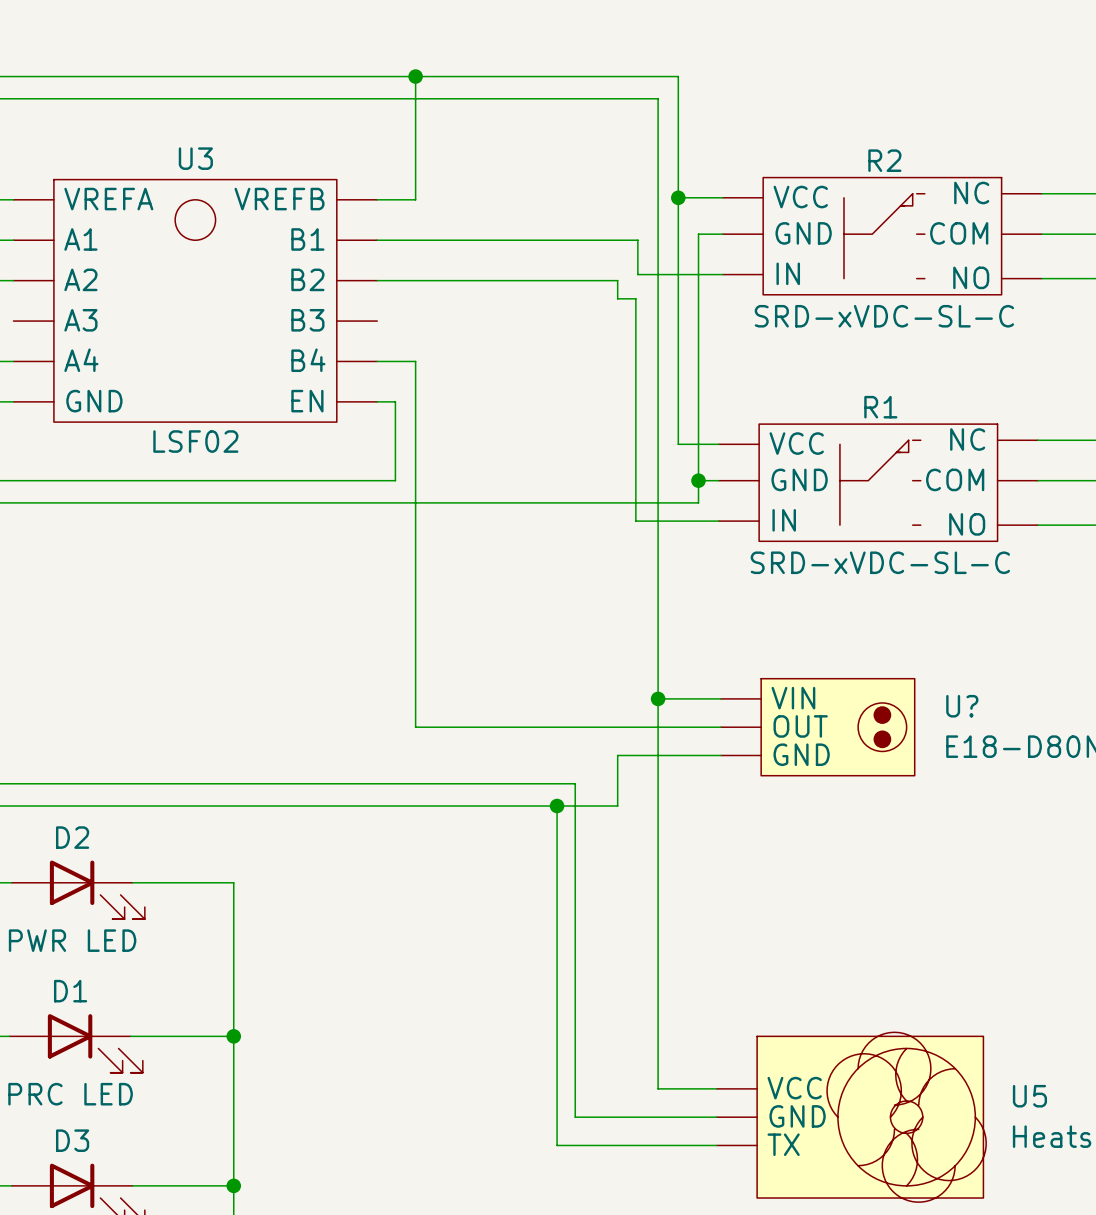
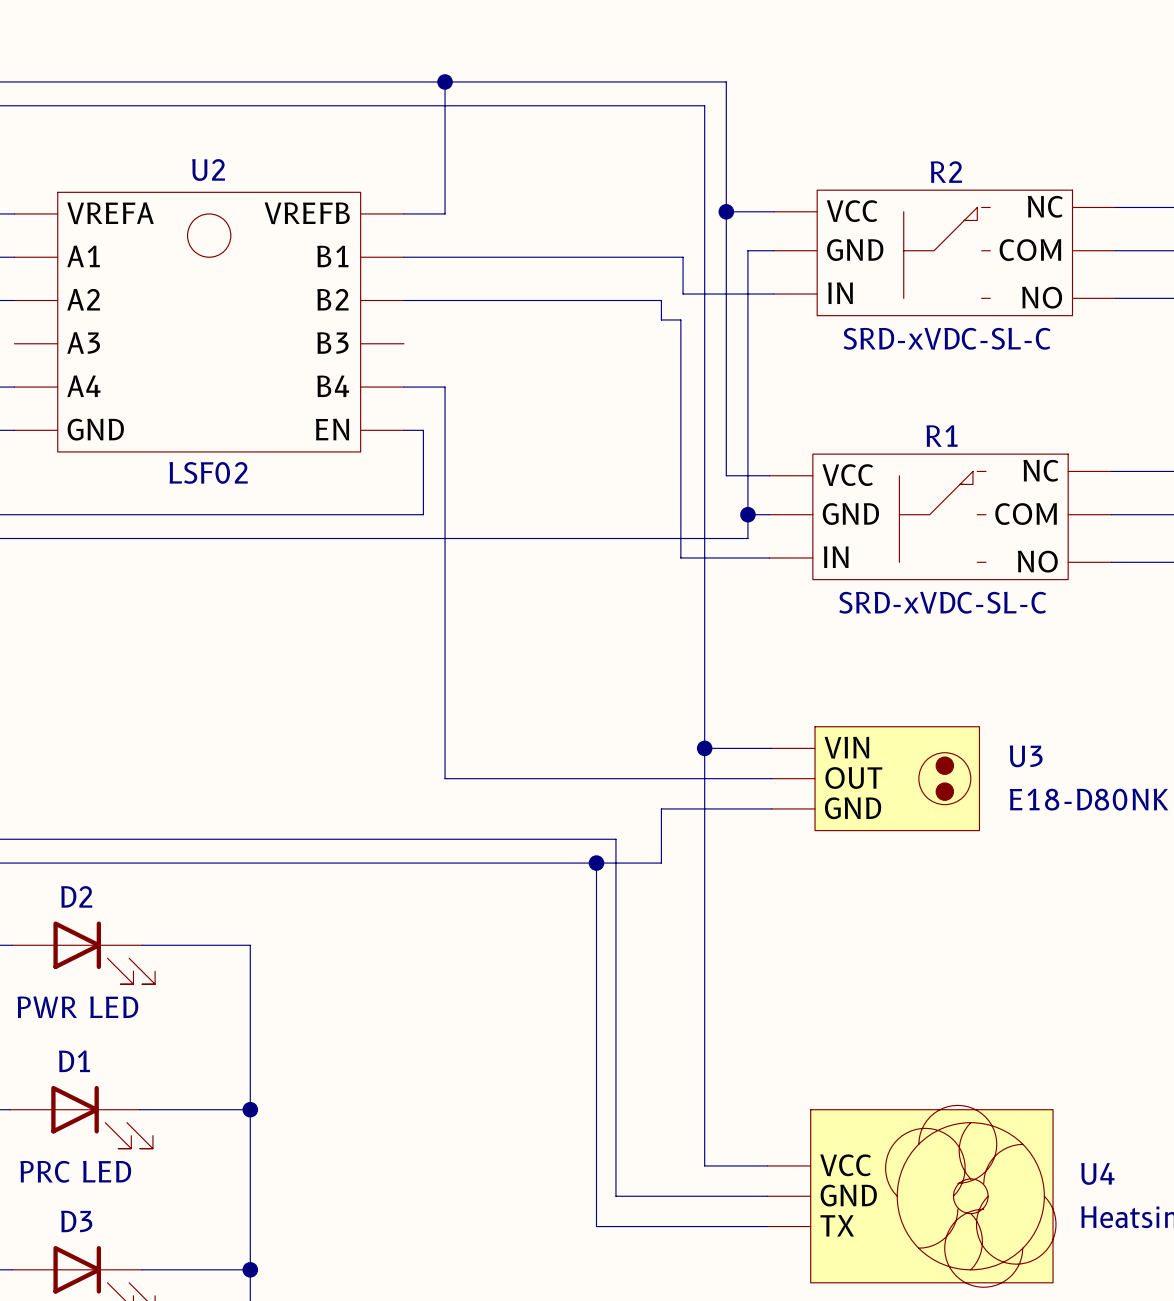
U3 name: U3 (195, 158) -> U2 (208, 169)
U? name: U? (962, 706) -> U3 (1026, 756)
U5 name: U5 (1029, 1096) -> U4 (1097, 1173)

